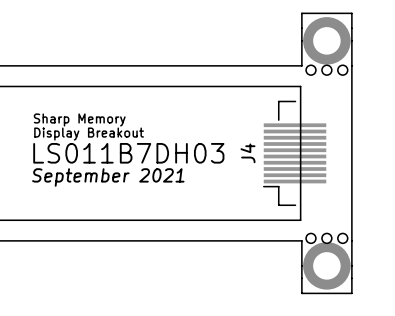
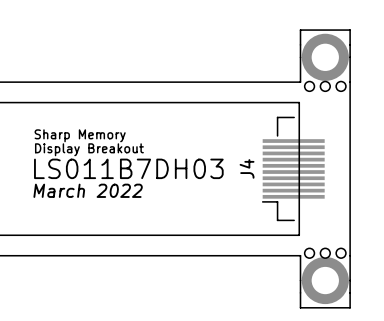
text: September 2021 (108, 177) -> March 2022 (88, 190)

